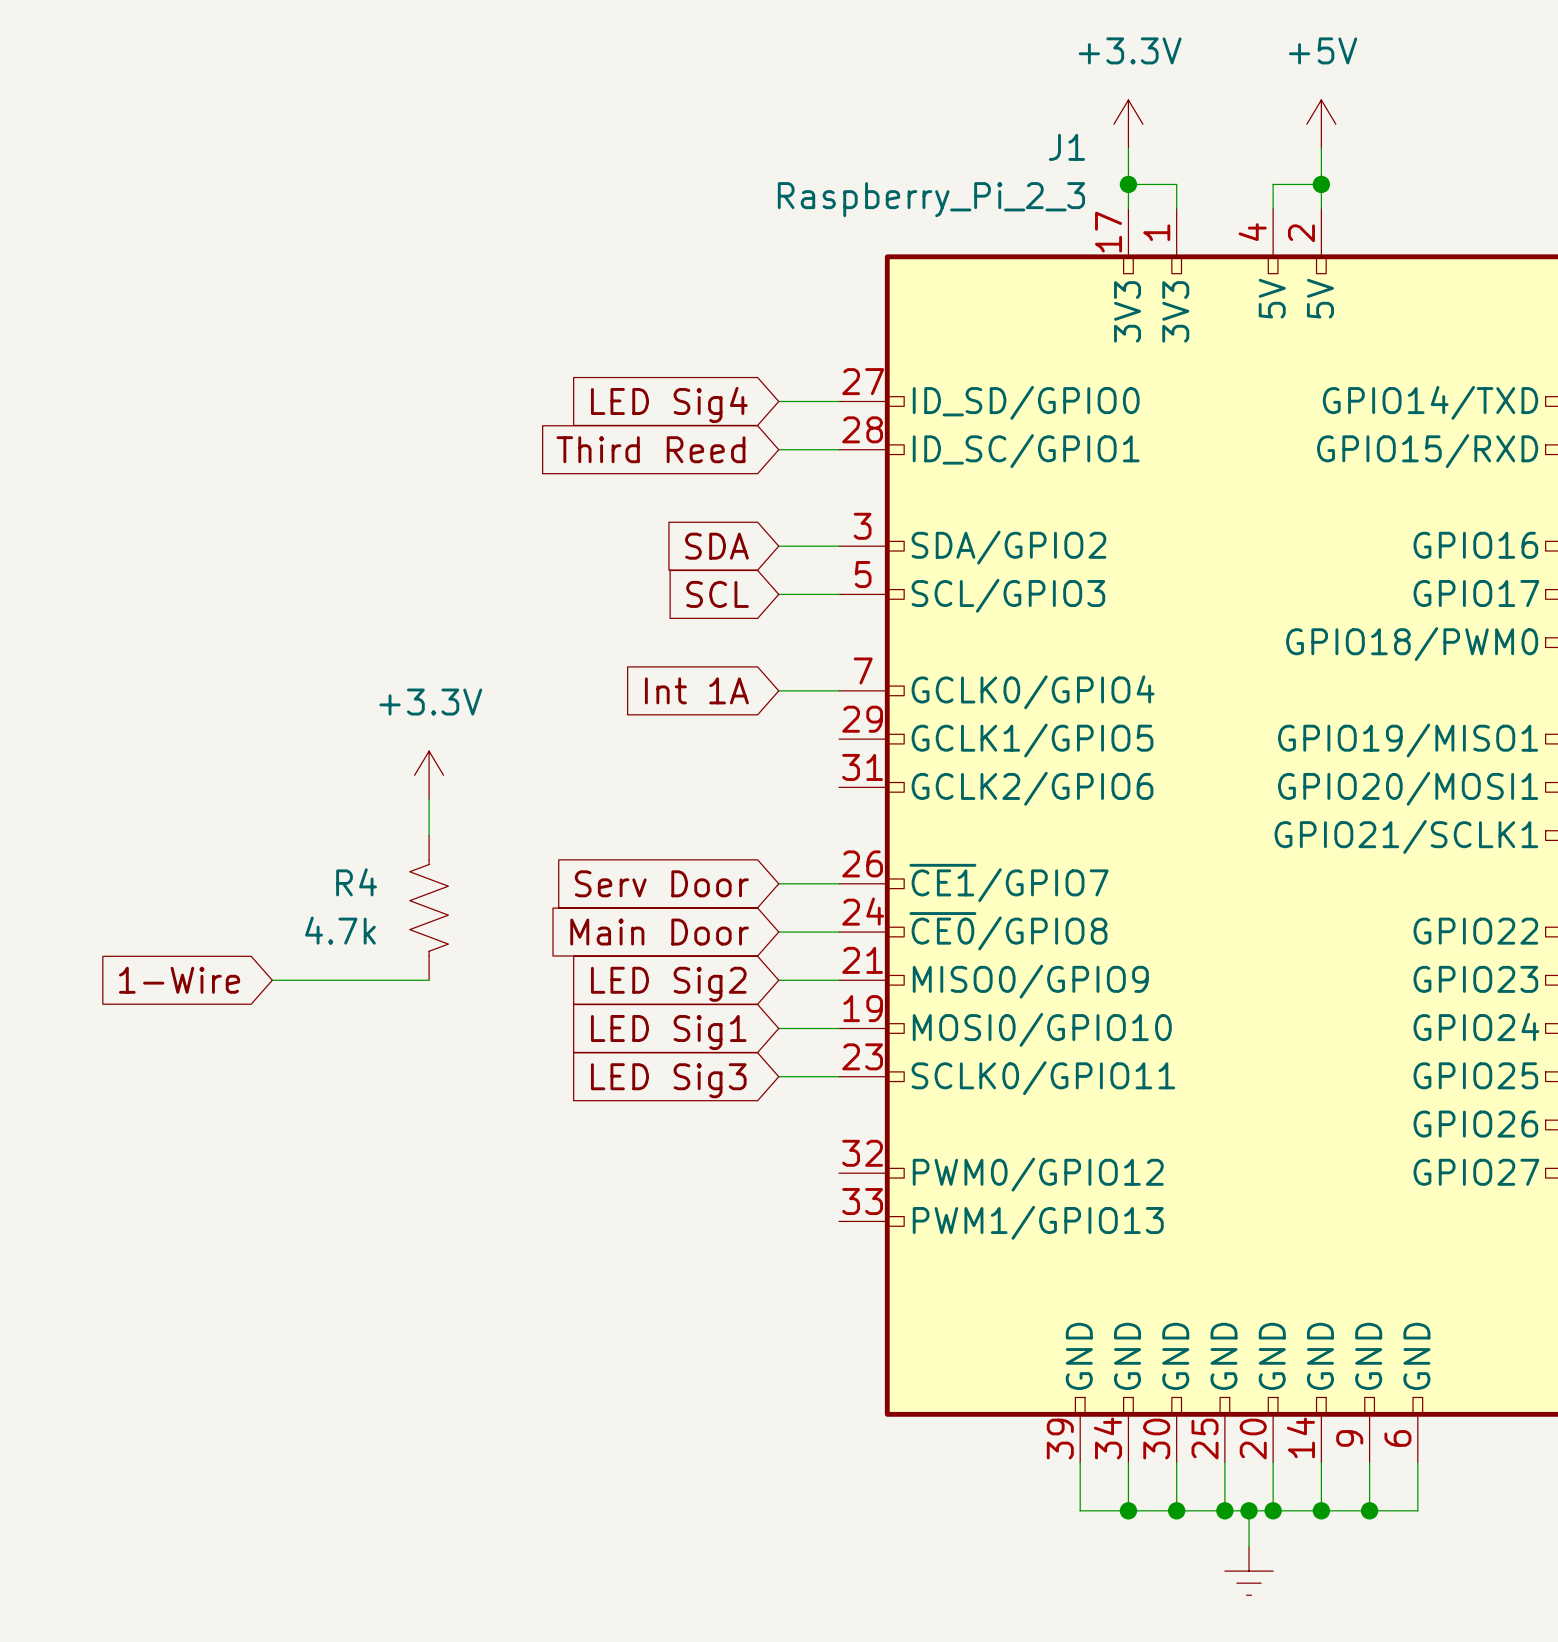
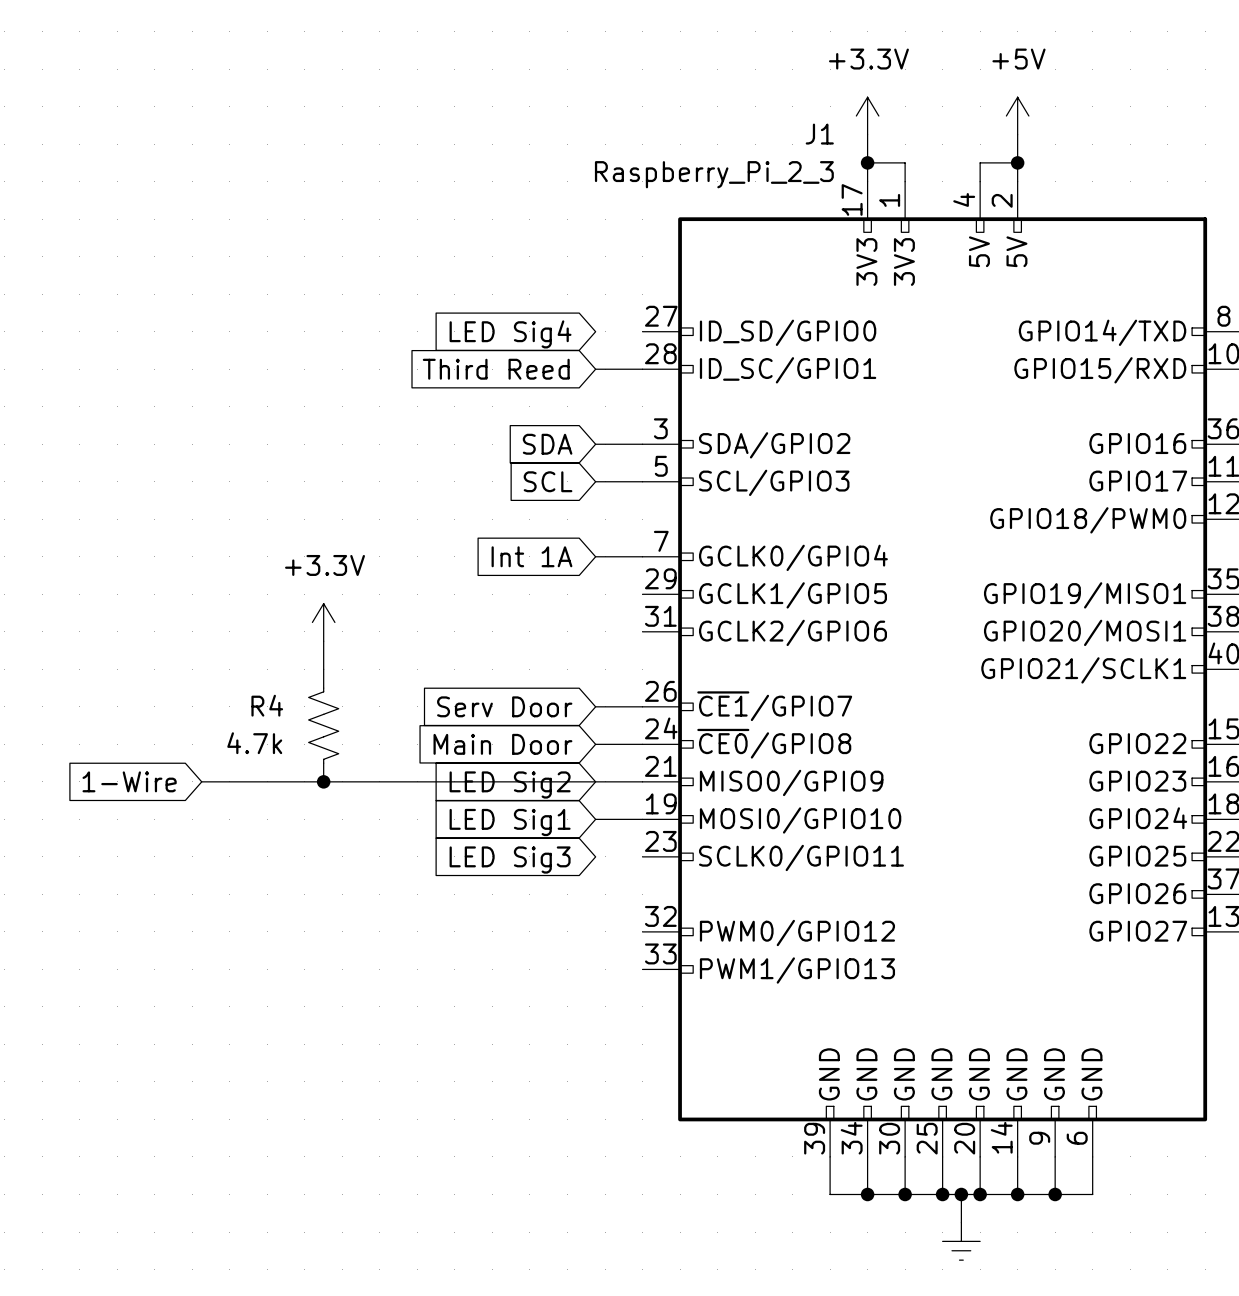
wire: (778, 401) (839, 401) -> none
wire: none -> (323, 781) (595, 781)
junction: none -> (323, 781)
wire: (778, 1076) (839, 1076) -> none

